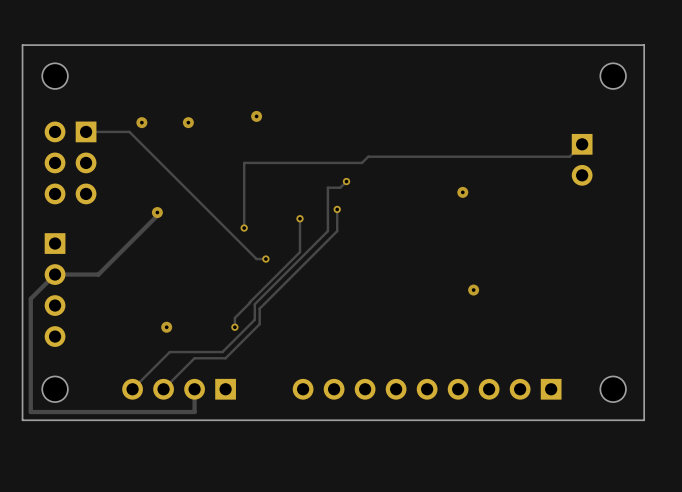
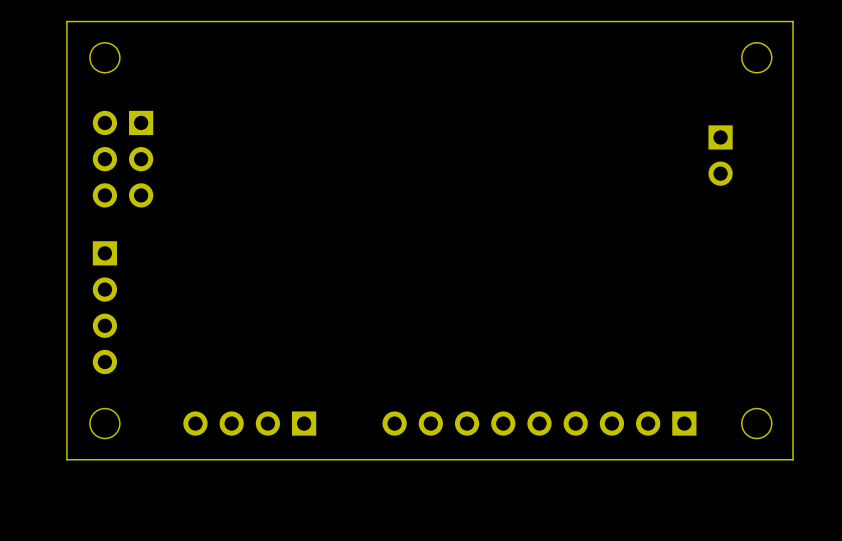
via: (256, 116) -> none
via: (141, 122) -> none
via: (188, 122) -> none
track: (86, 131) (129, 131) (256, 259) (265, 259) -> none
track: (582, 144) (569, 156) (368, 156) (362, 162) (244, 162) (244, 228) -> none
track: (346, 181) (340, 187) (327, 187) (327, 231) (254, 304) (254, 319) (222, 352) (169, 352) (132, 389) -> none
via: (346, 181) -> none
via: (462, 192) -> none
track: (337, 209) (337, 231) (259, 308) (259, 324) (225, 358) (194, 358) (163, 389) -> none
via: (337, 209) -> none
track: (157, 212) (157, 215) (98, 274) (55, 274) (30, 298) (30, 412) (194, 412) (194, 389) -> none
via: (157, 212) -> none
track: (300, 218) (300, 252) (234, 317) (234, 327) -> none
via: (300, 218) -> none
via: (244, 228) -> none
via: (265, 259) -> none
via: (473, 290) -> none
via: (166, 327) -> none
via: (234, 327) -> none

